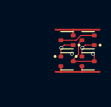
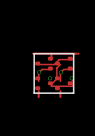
line: none -> (34, 53) (73, 53) (73, 93) (34, 93) (34, 53)
part footprint: [58, 31, 81, 50] -> [35, 56, 53, 71]
part footprint: [79, 31, 102, 50] -> [54, 56, 73, 71]
part footprint: [53, 52, 76, 71] -> [35, 76, 53, 91]
part footprint: [74, 52, 97, 71] -> [54, 76, 73, 91]
track: (55, 71) (99, 71) -> none

